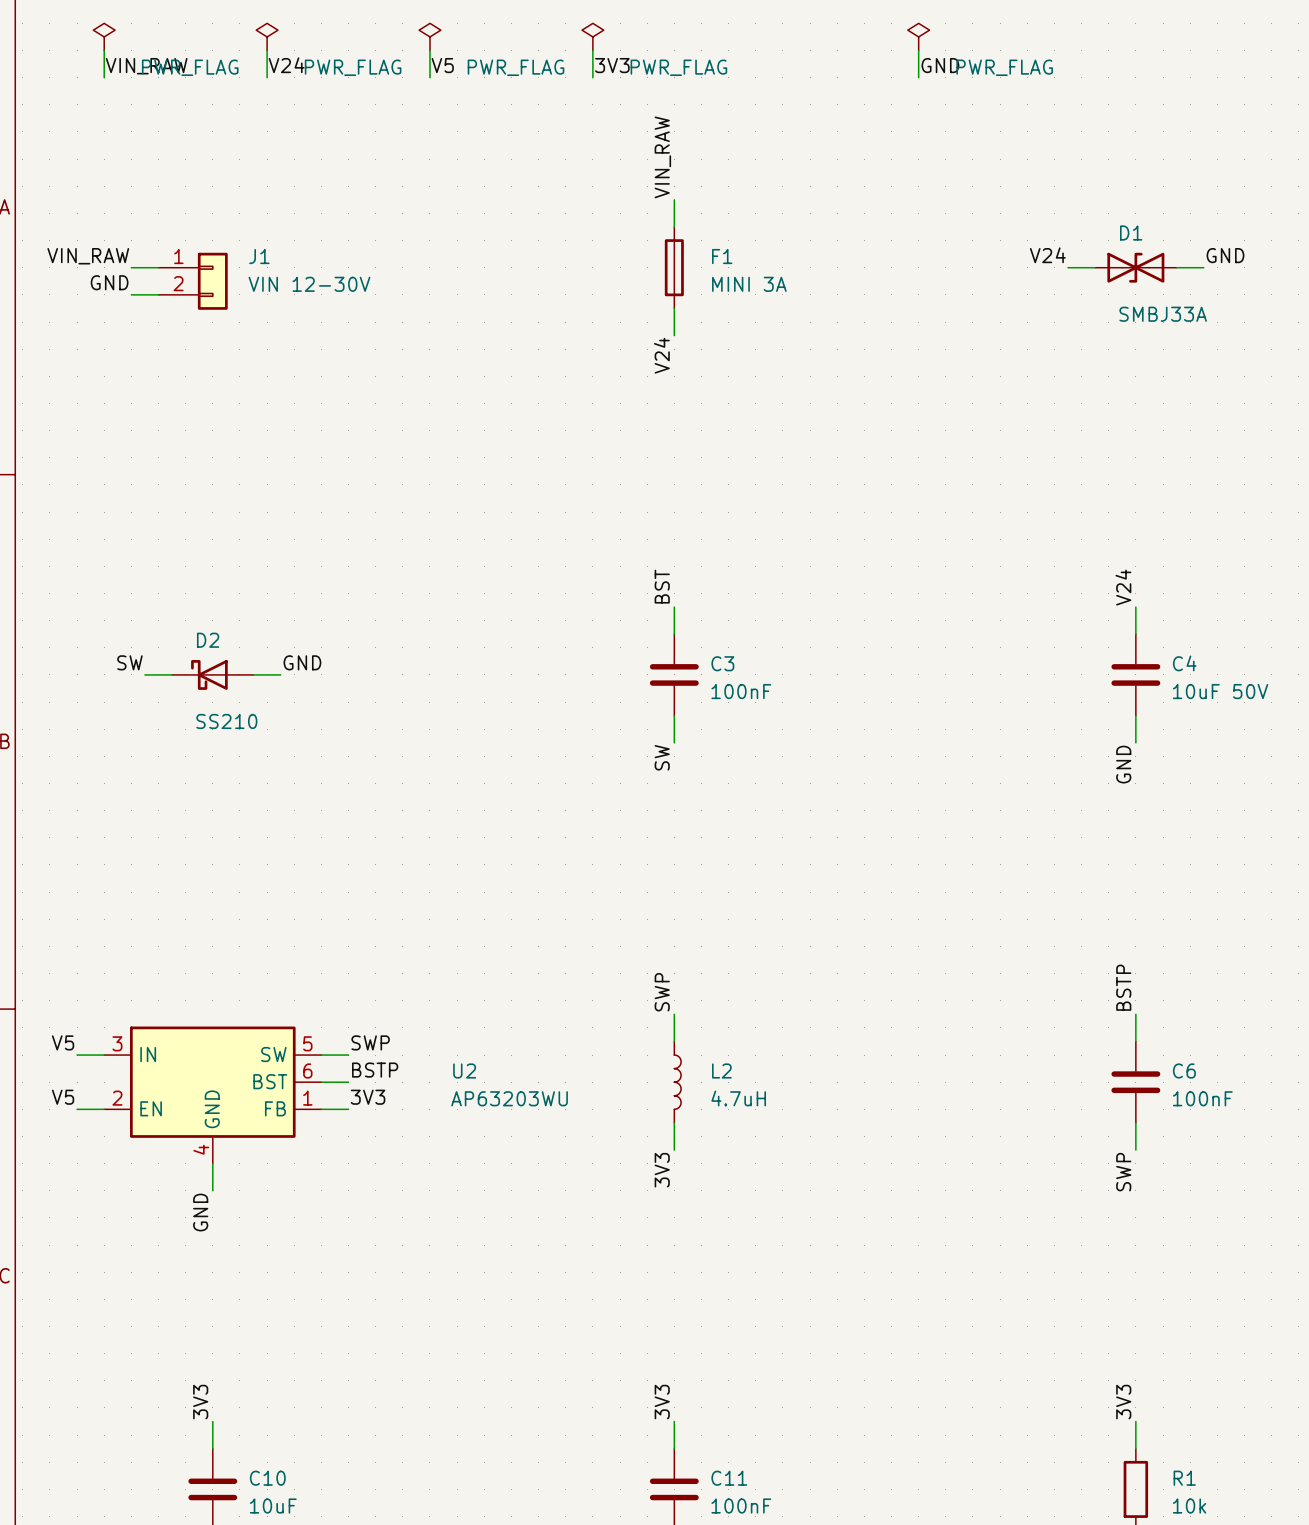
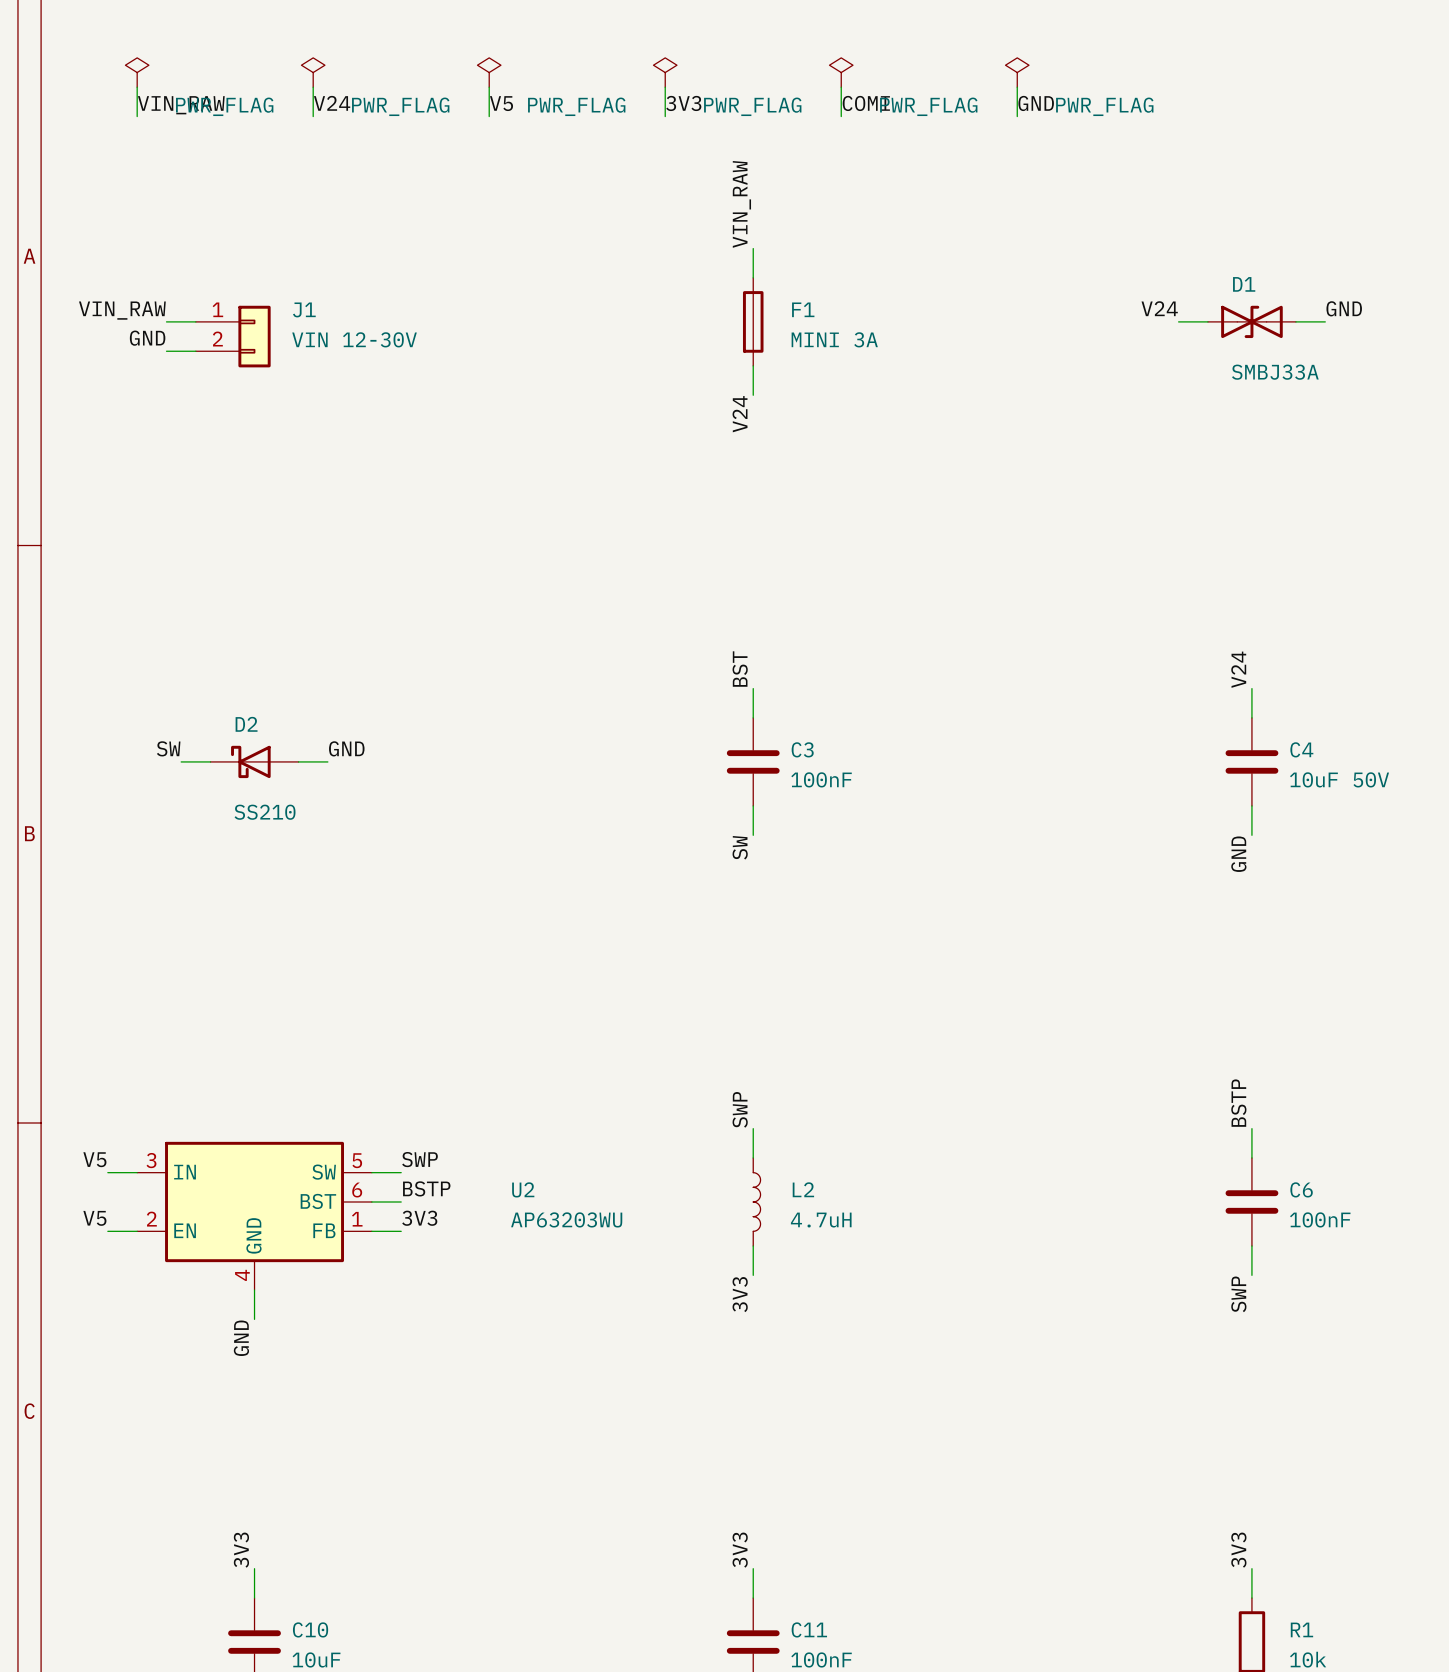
power symbol: none -> PWR_FLAG (841, 72)
wire: none -> (841, 87) (841, 116)
label: none -> COMI (866, 103)

